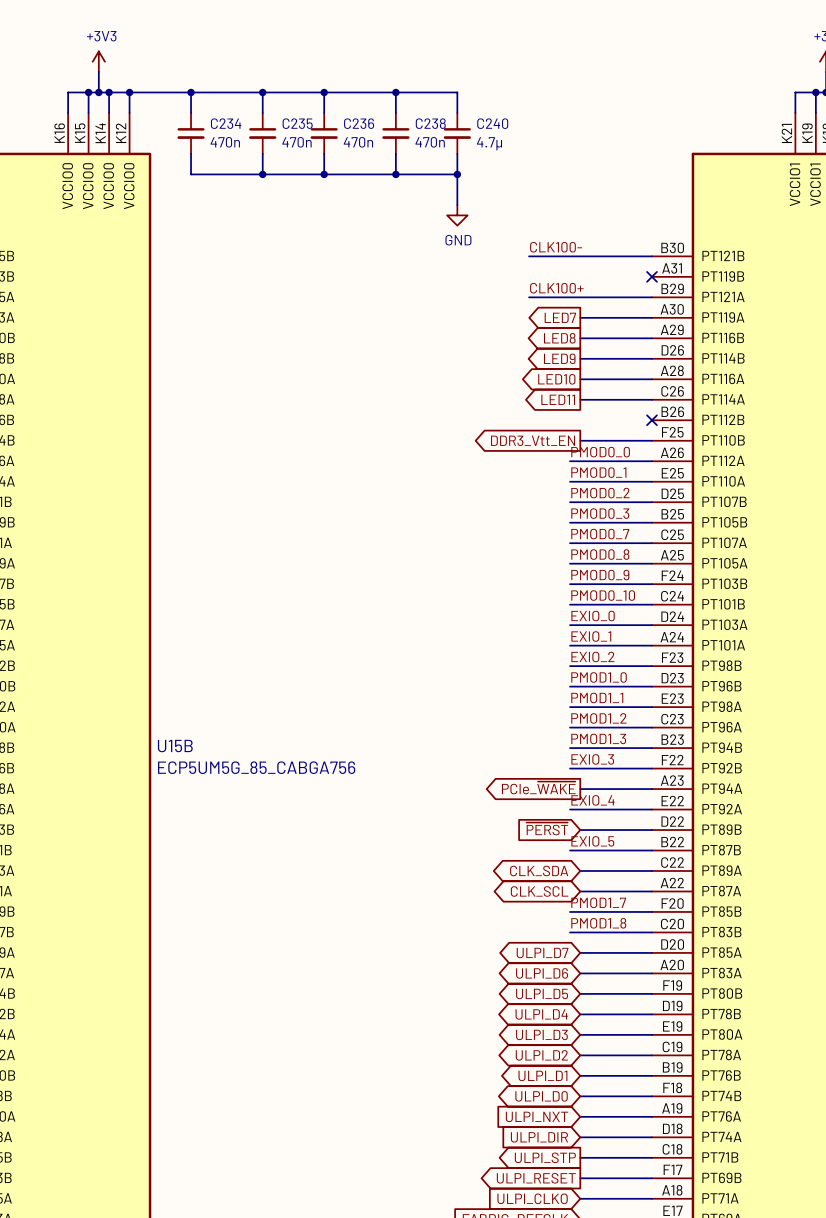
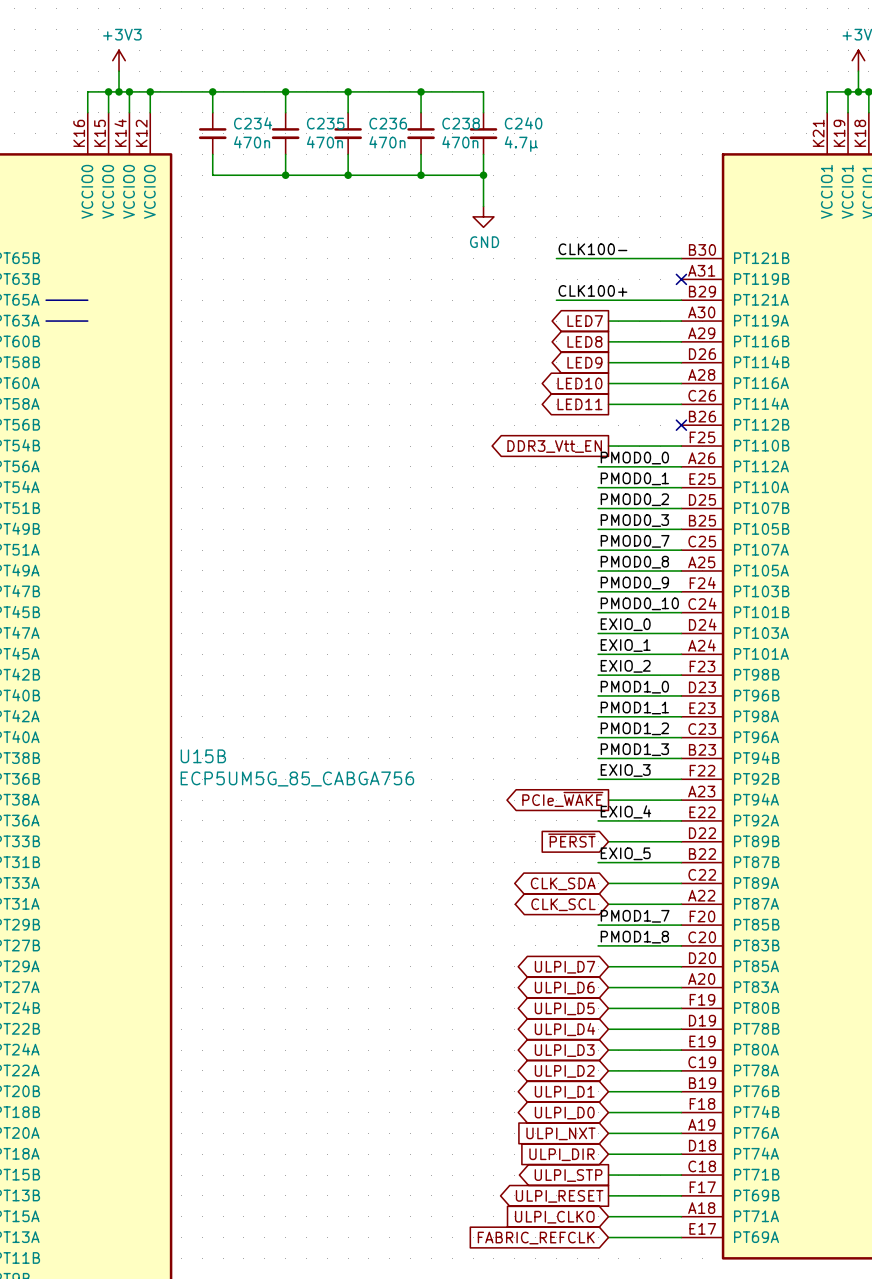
bus: none -> (46, 300) (87, 300)
bus: none -> (46, 321) (87, 321)

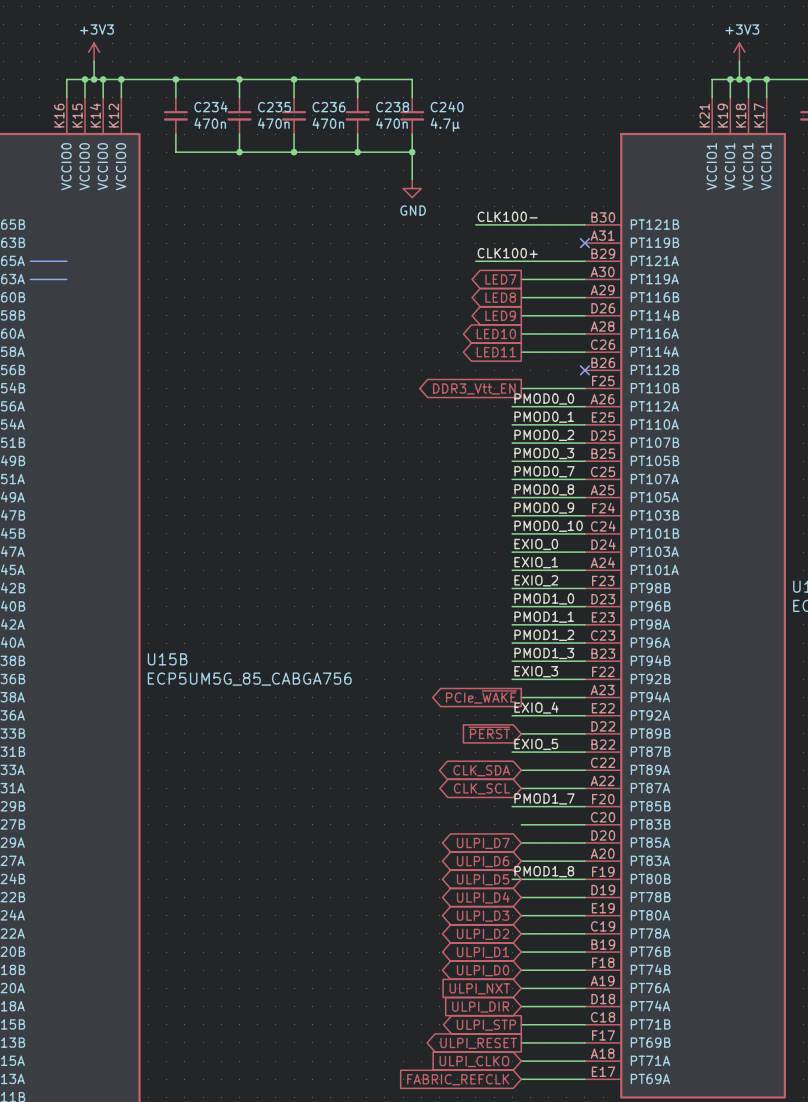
label position: PMOD1_8 (634, 937) -> PMOD1_8 (544, 871)
wire: (598, 945) (608, 945) -> (512, 879) (521, 879)

